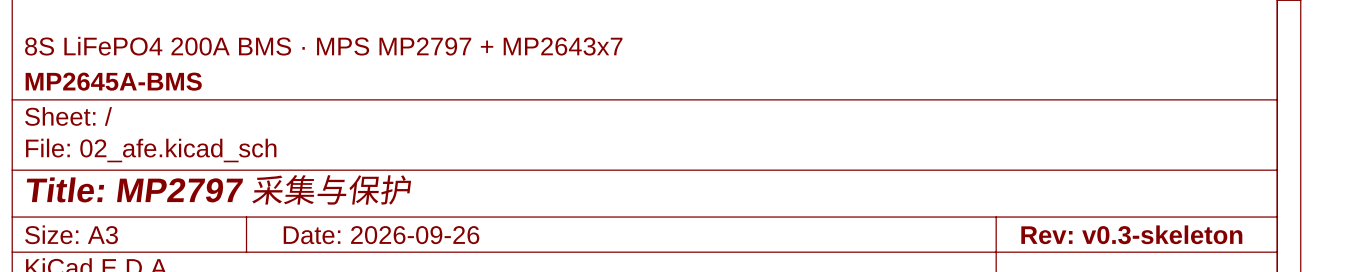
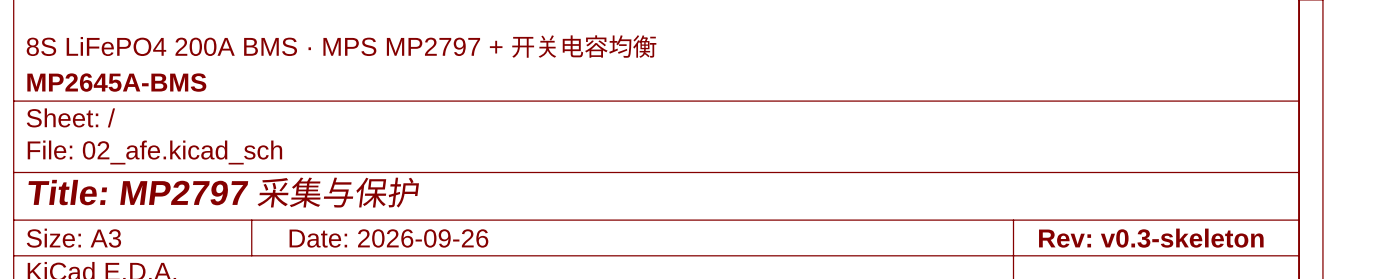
title block: 8S LiFePO4 200A BMS · MPS MP2797 + MP2643x7 (323, 46) -> 8S LiFePO4 200A BMS · MPS MP2797 + 开关电容均衡 (341, 46)

